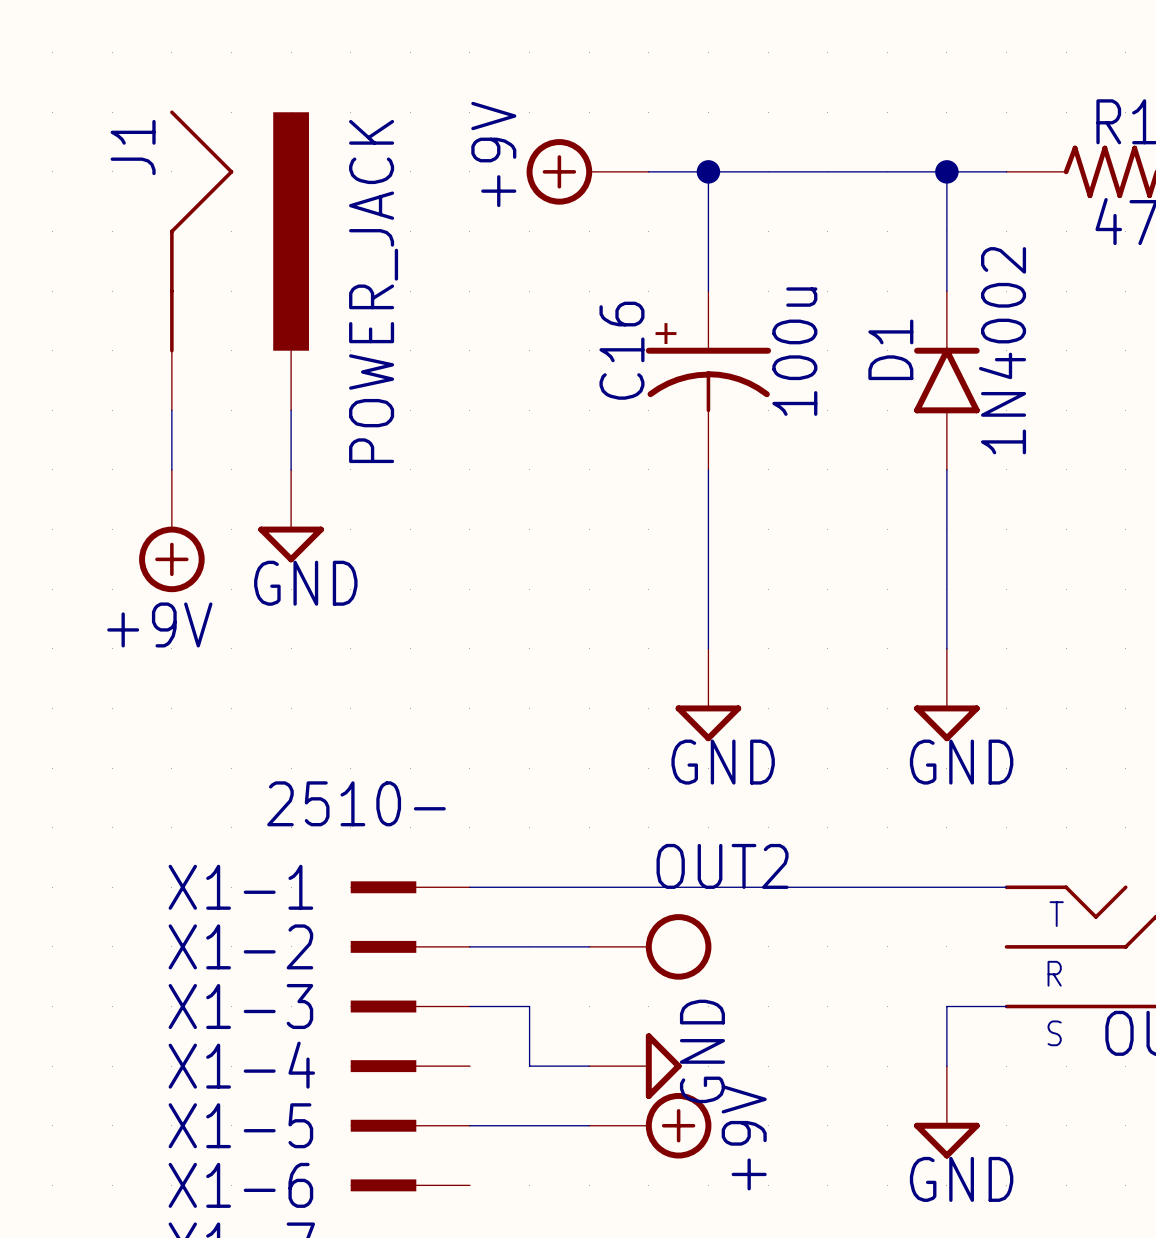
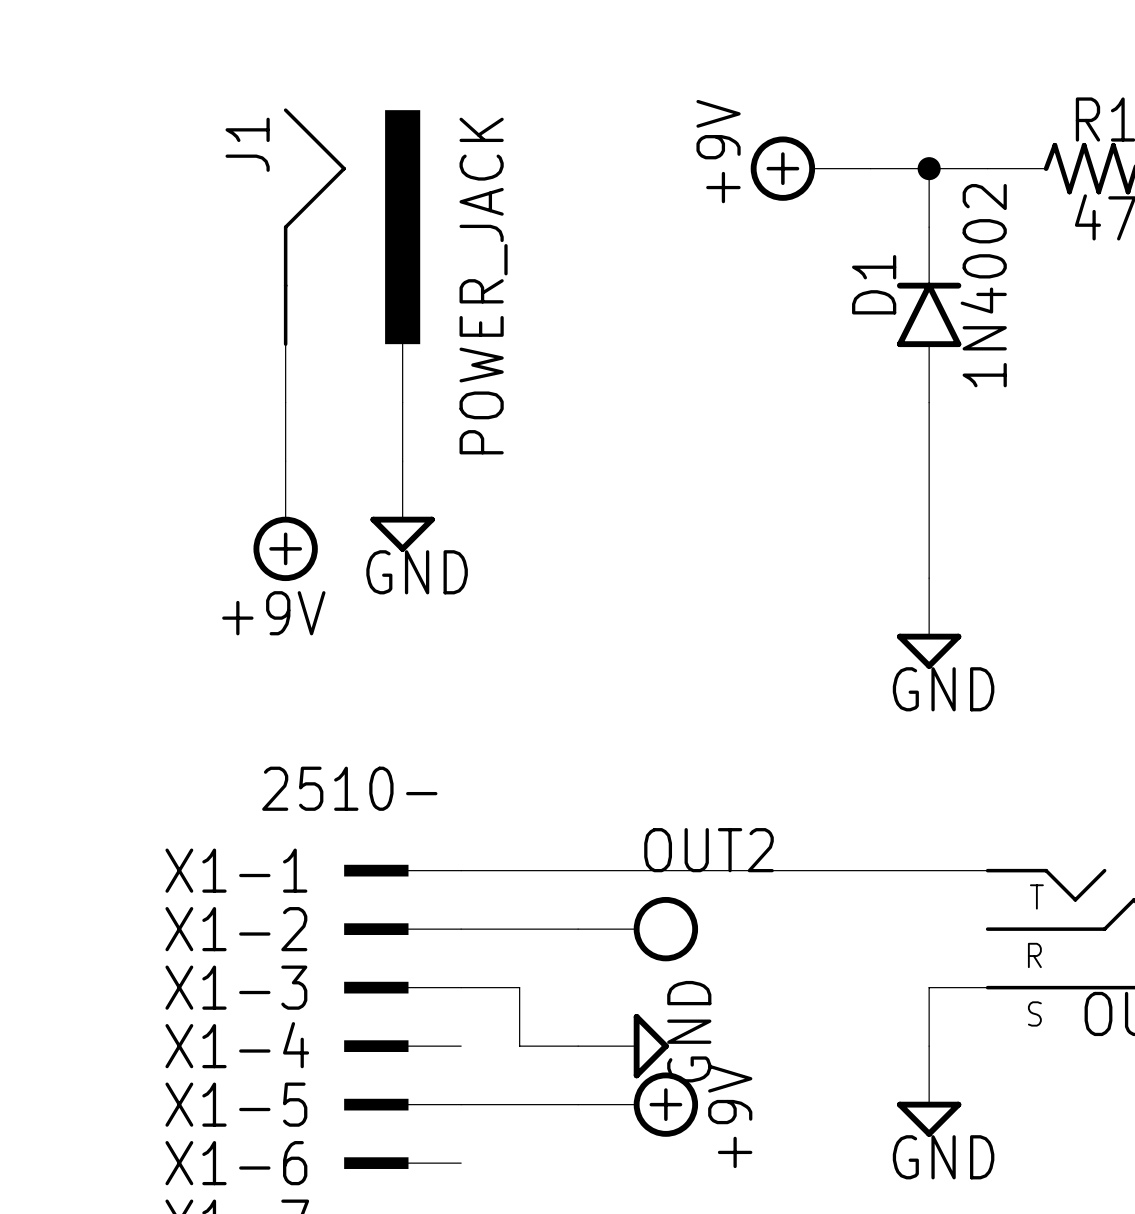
power symbol position: +9V (587, 171) -> +9V (810, 168)
wire: (648, 171) (887, 171) -> none
wire: (708, 171) (708, 291) -> none
junction: (708, 171) -> none
J1 position: (239, 260) -> (352, 255)
C16: 100u (708, 380) -> none
D1 position: (946, 380) -> (929, 314)
wire: (171, 410) (171, 469) -> (402, 402) (402, 461)
wire: (708, 469) (708, 648) -> none
power symbol: GND (291, 516) -> +9V (285, 521)
power symbol: none -> GND (402, 506)
power symbol: +9V (171, 531) -> none
power symbol: GND (708, 695) -> none
power symbol position: GND (946, 695) -> GND (929, 623)

